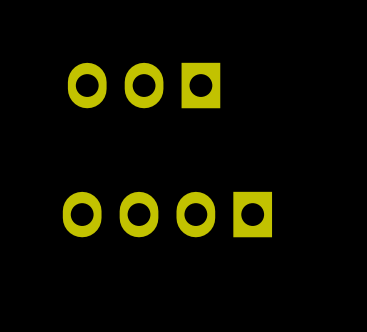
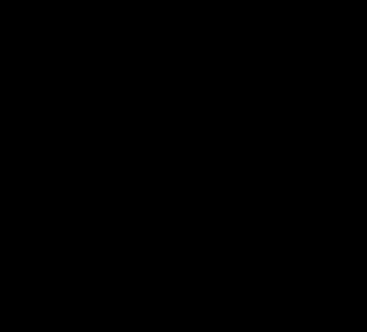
part: (144, 85) -> none
part: (167, 214) -> none

